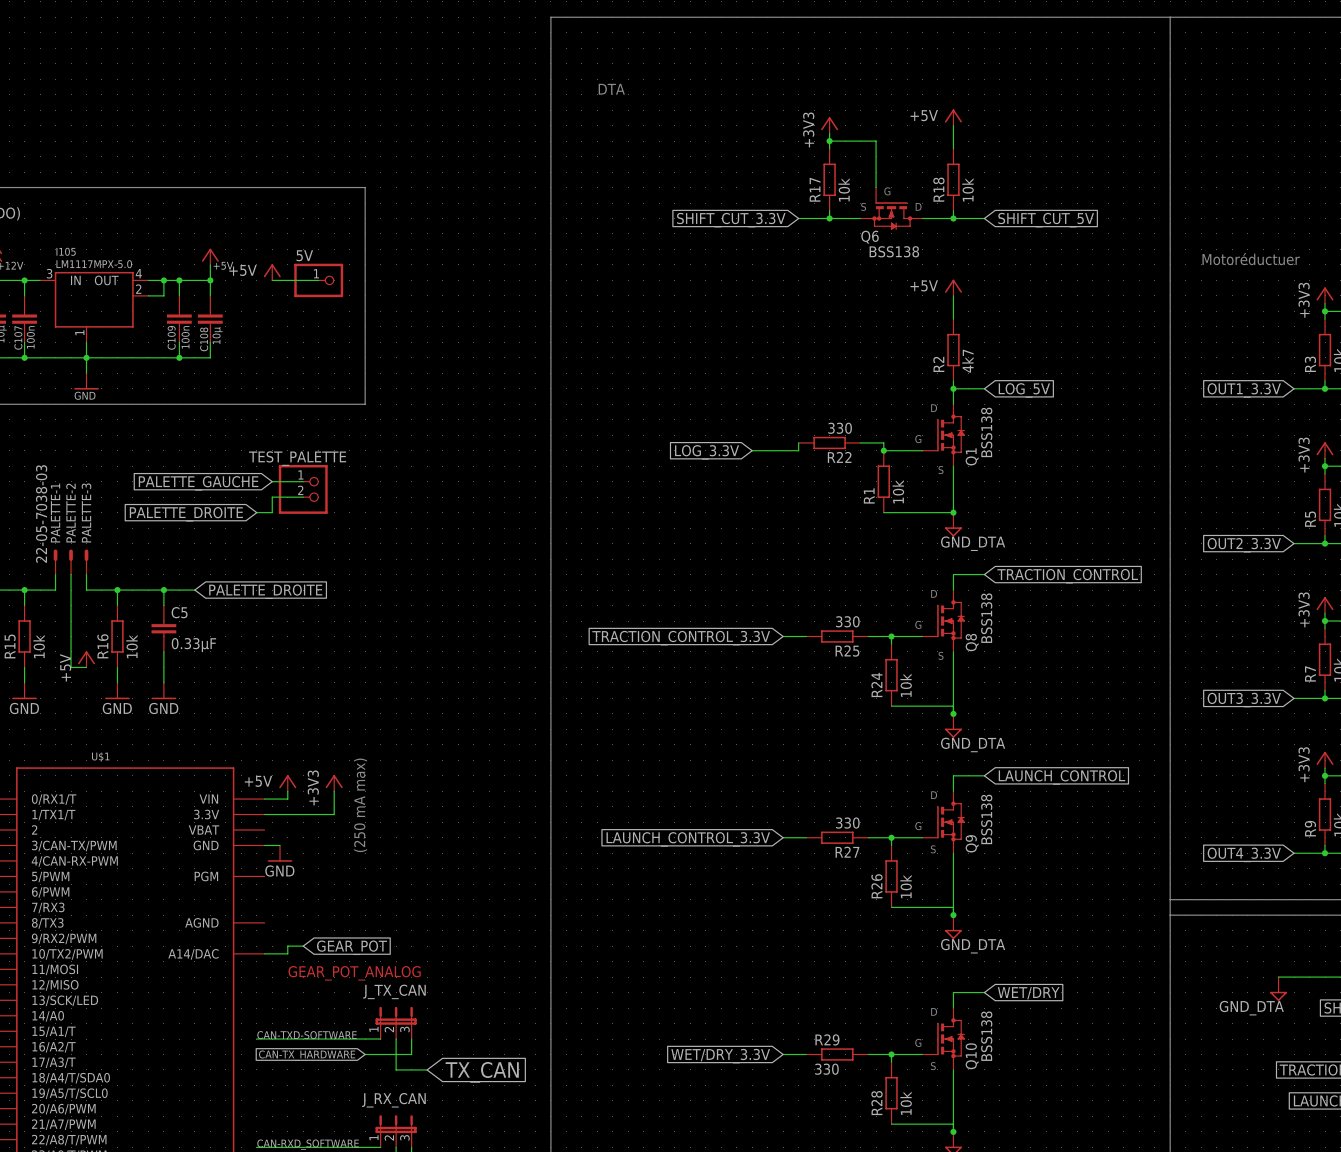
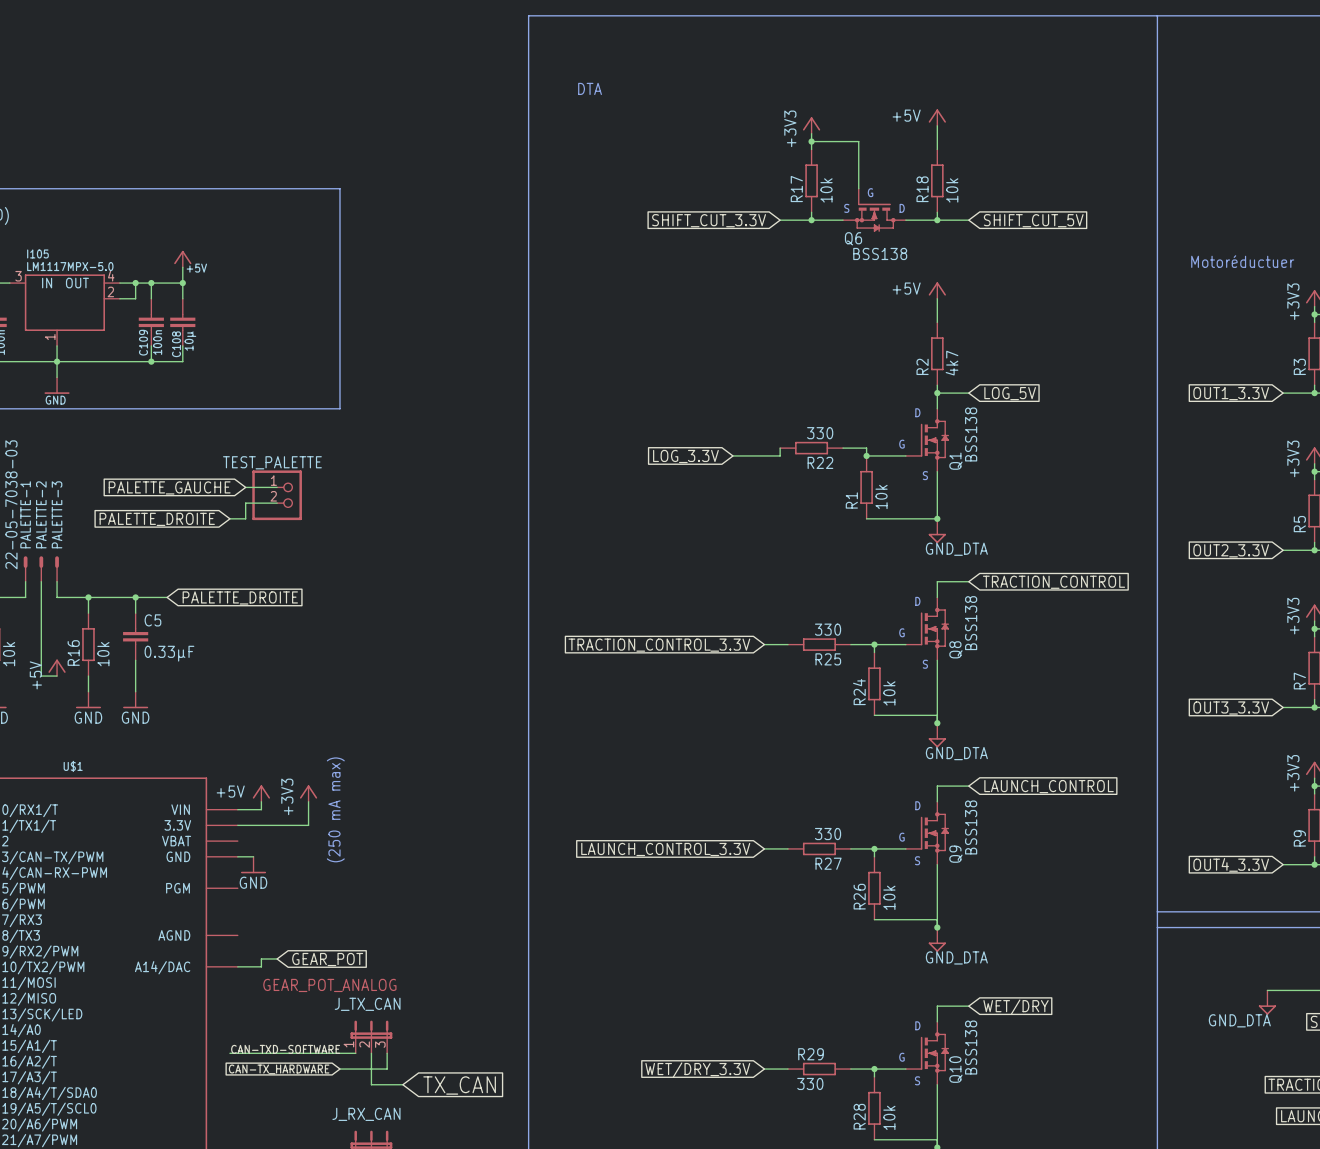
power symbol: +5V (272, 272) -> none
wire: (272, 280) (318, 280) -> none
5V: (318, 280) -> none

